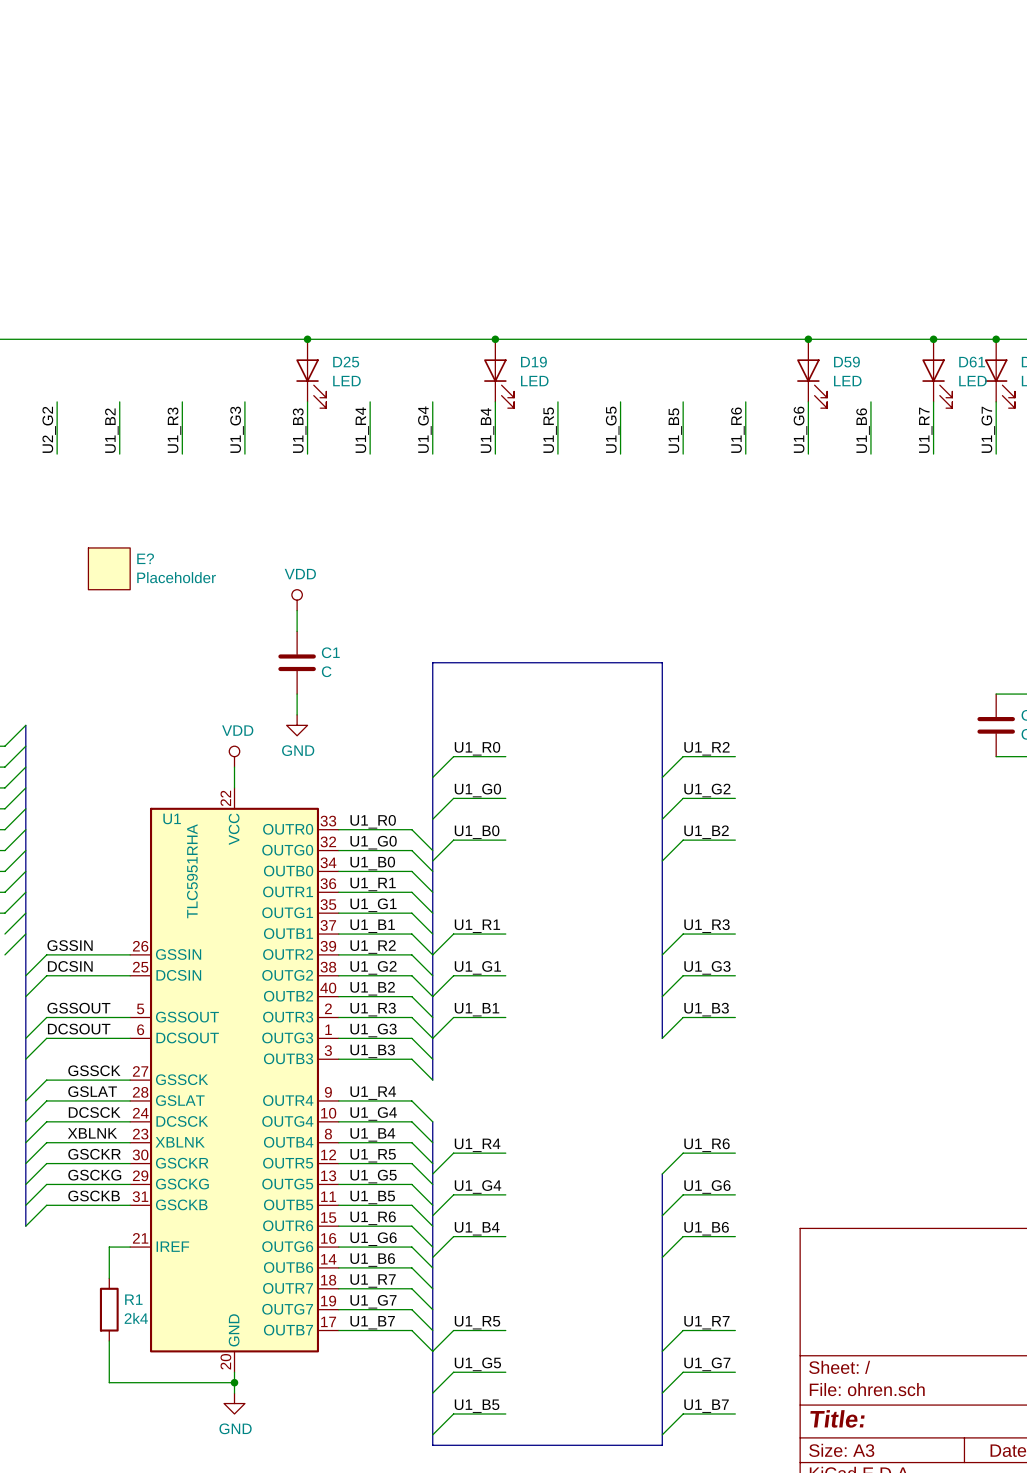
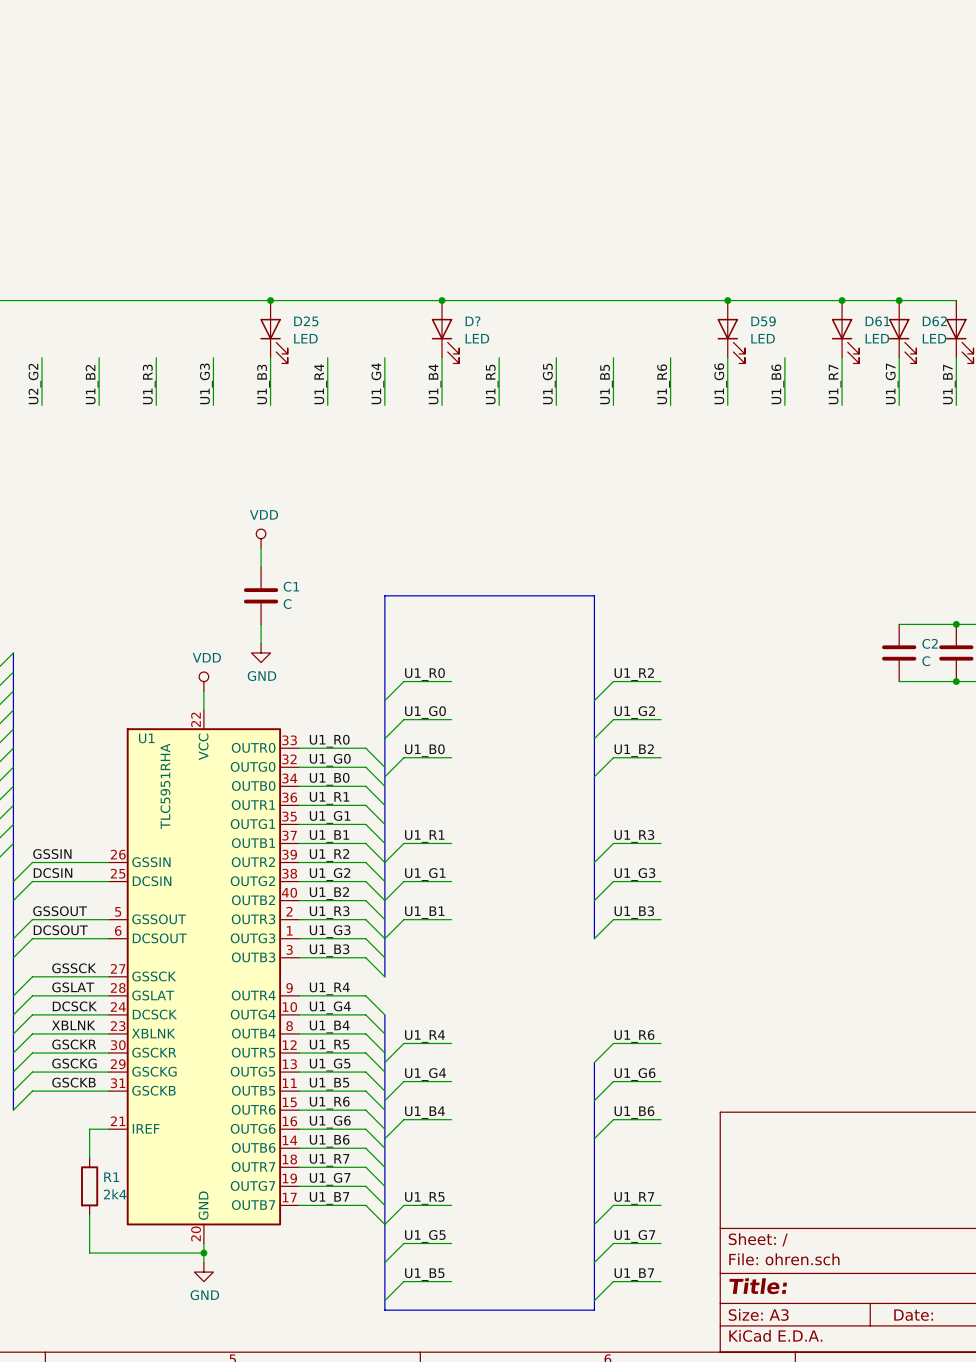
D19 name: D19 (533, 362) -> D? (472, 321)
E?: Placeholder (109, 568) -> none

